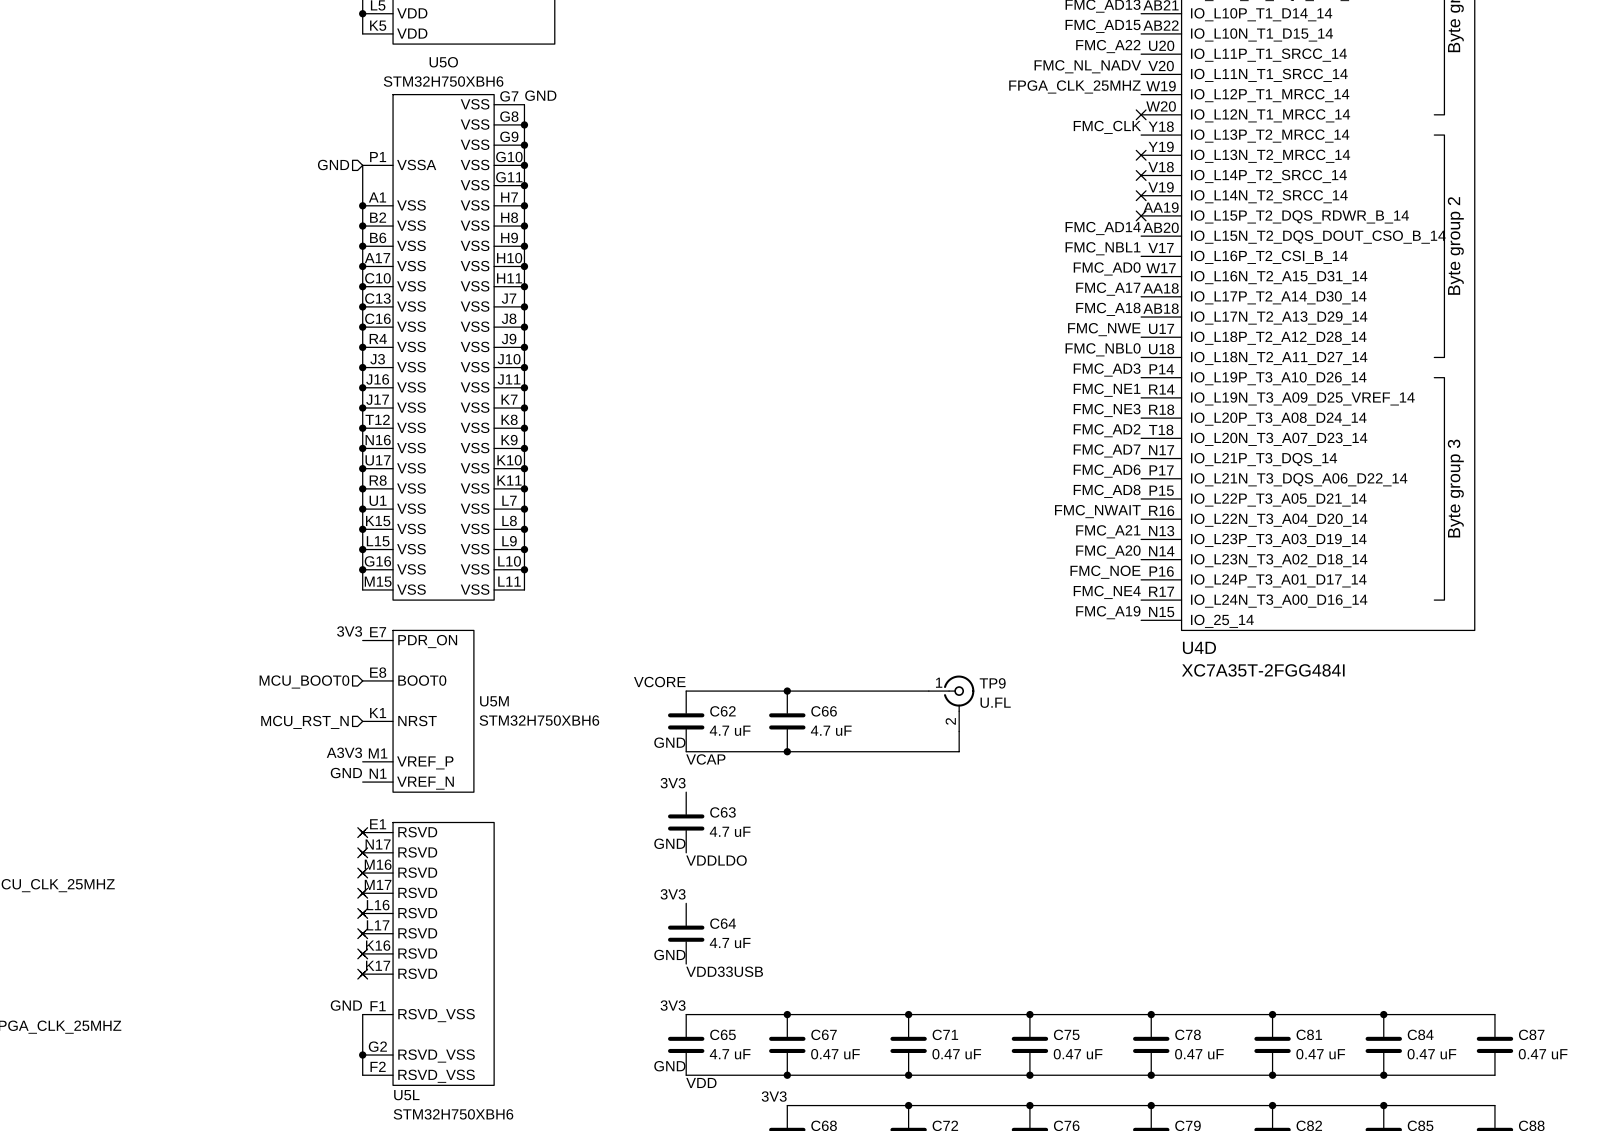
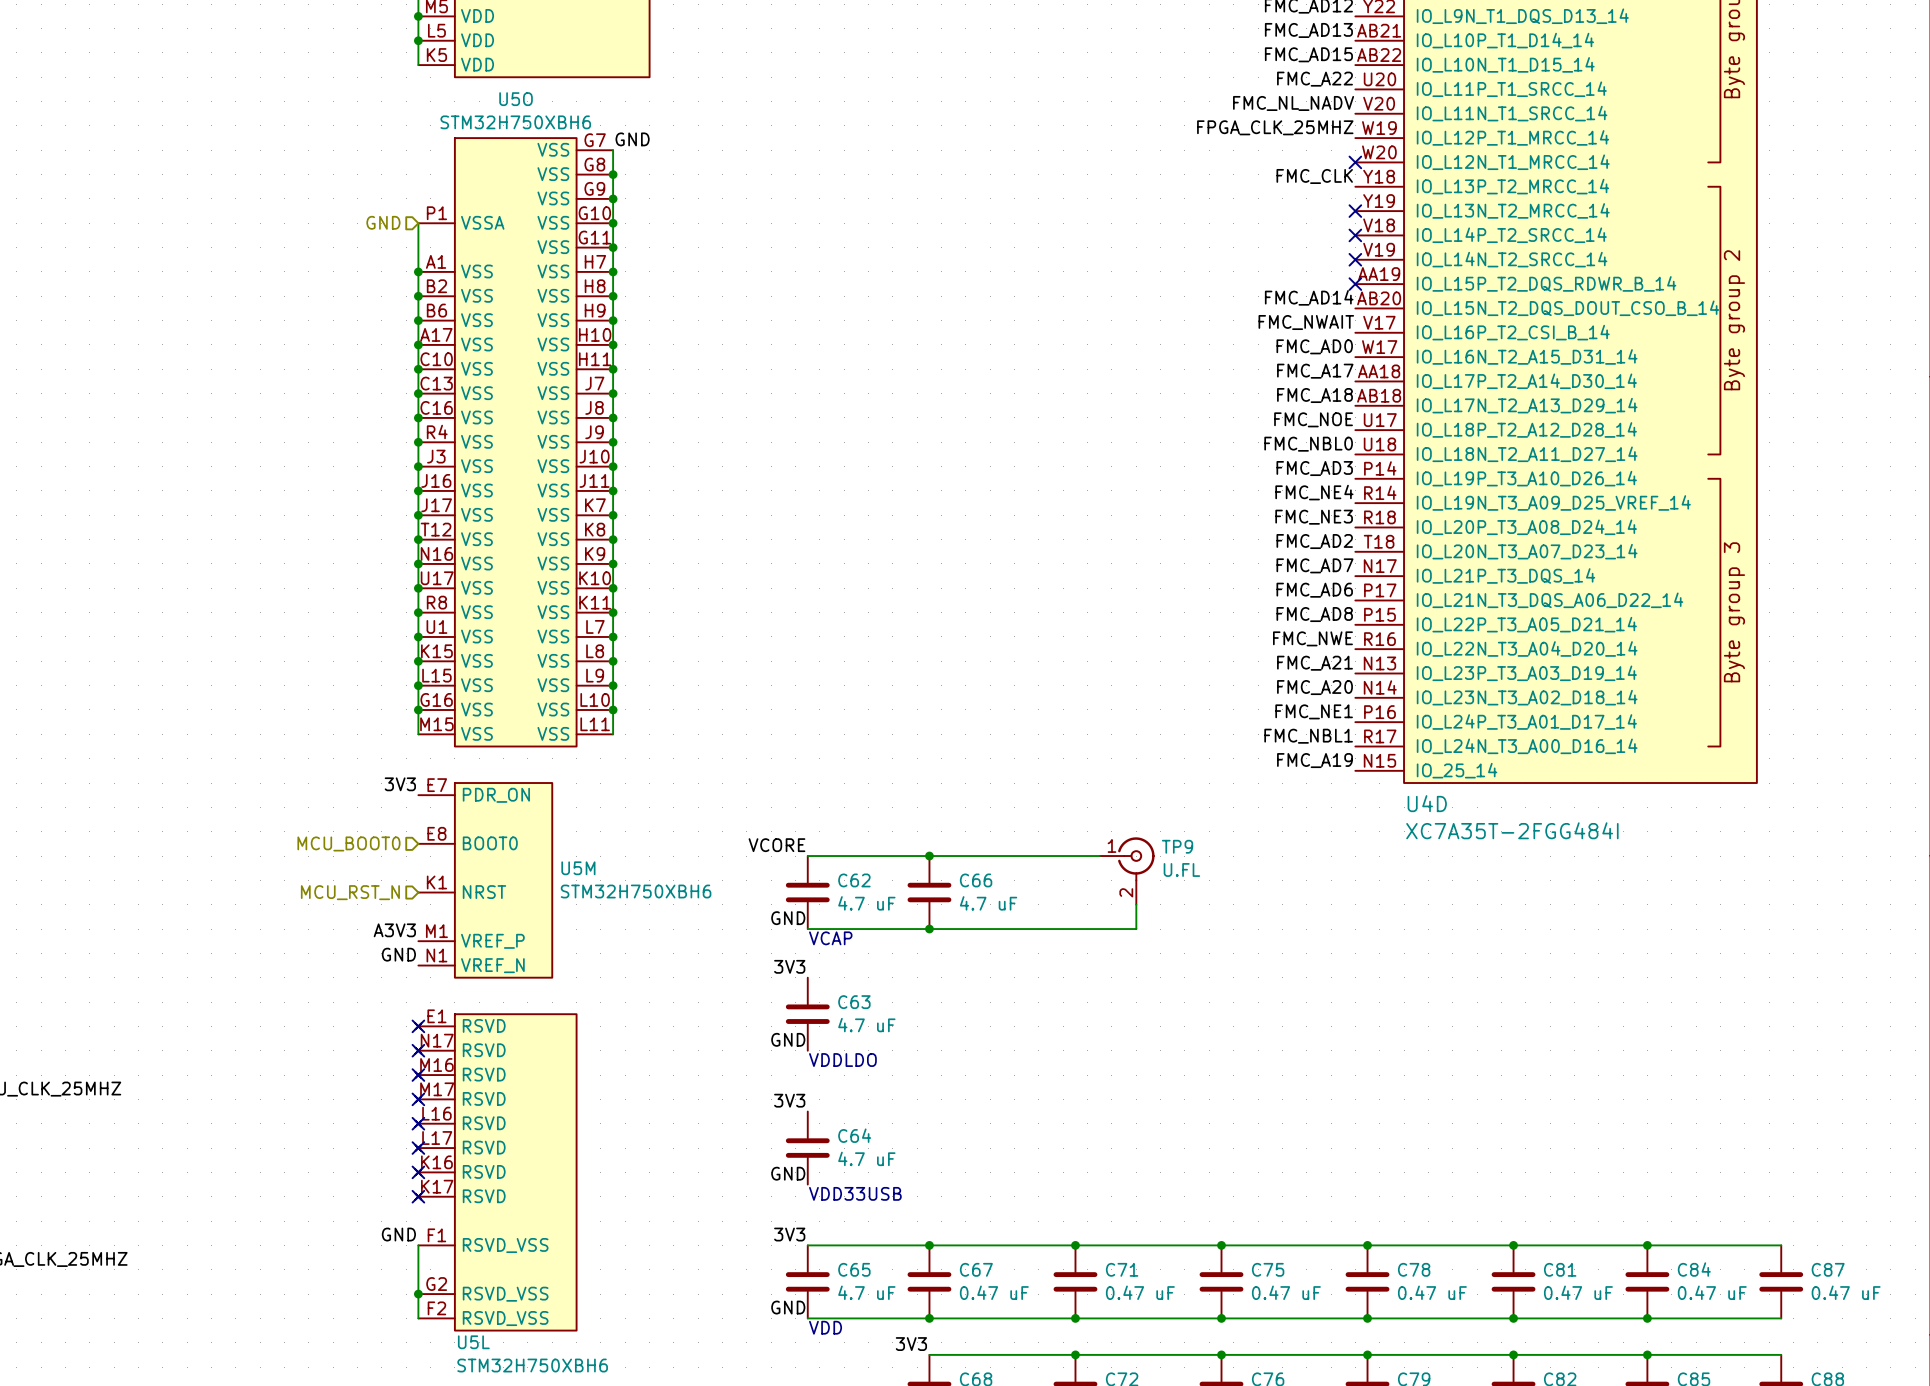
label: FMC_NBL1 (1103, 248) -> FMC_NWAIT (1306, 322)
label: FMC_NWE (1104, 329) -> FMC_NOE (1313, 419)
label: FMC_NE1 (1107, 390) -> FMC_NE4 (1314, 492)
label: FMC_NWAIT (1097, 511) -> FMC_NWE (1312, 638)
label: FMC_NOE (1105, 572) -> FMC_NE1 (1314, 711)
label: FMC_NE4 (1107, 592) -> FMC_NBL1 (1308, 736)

